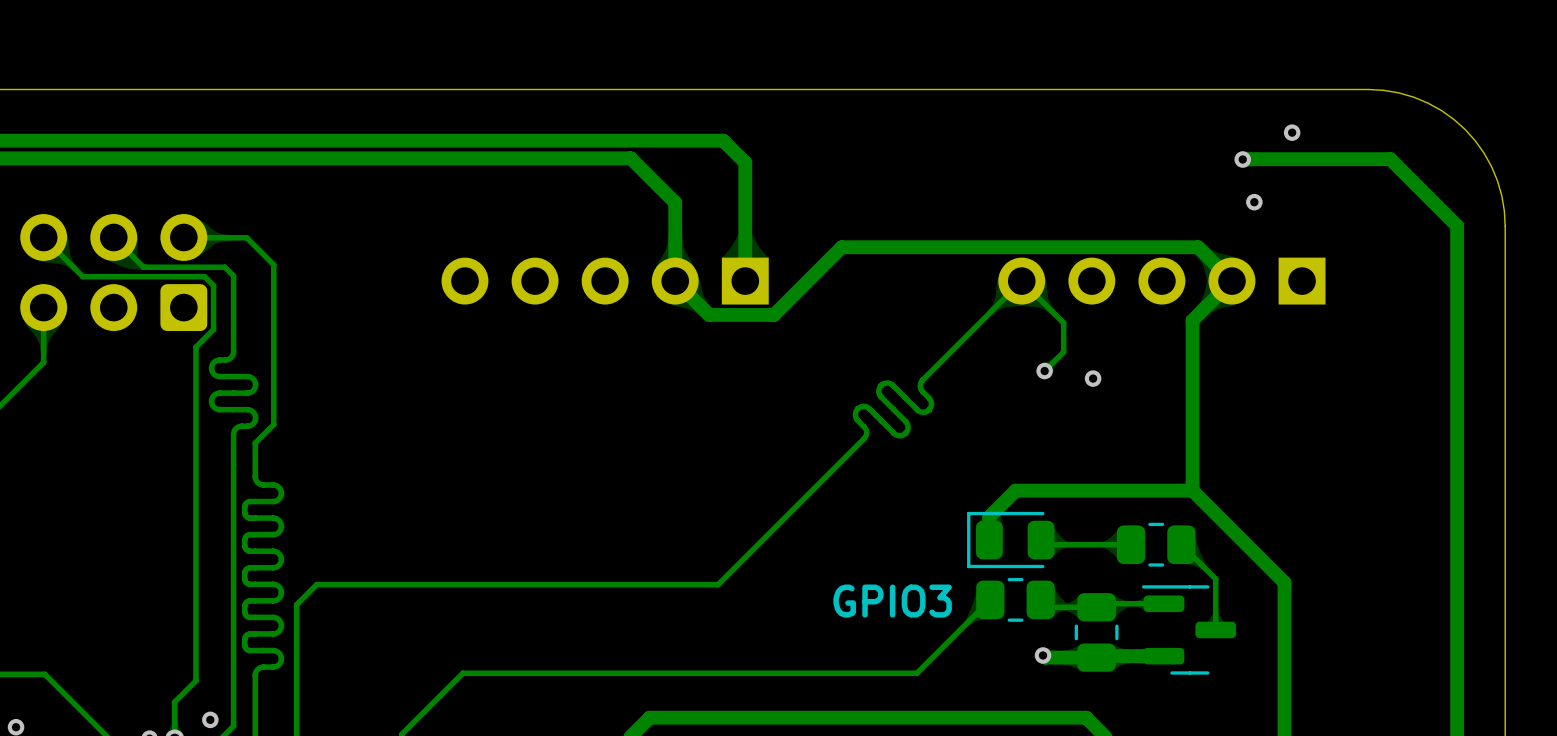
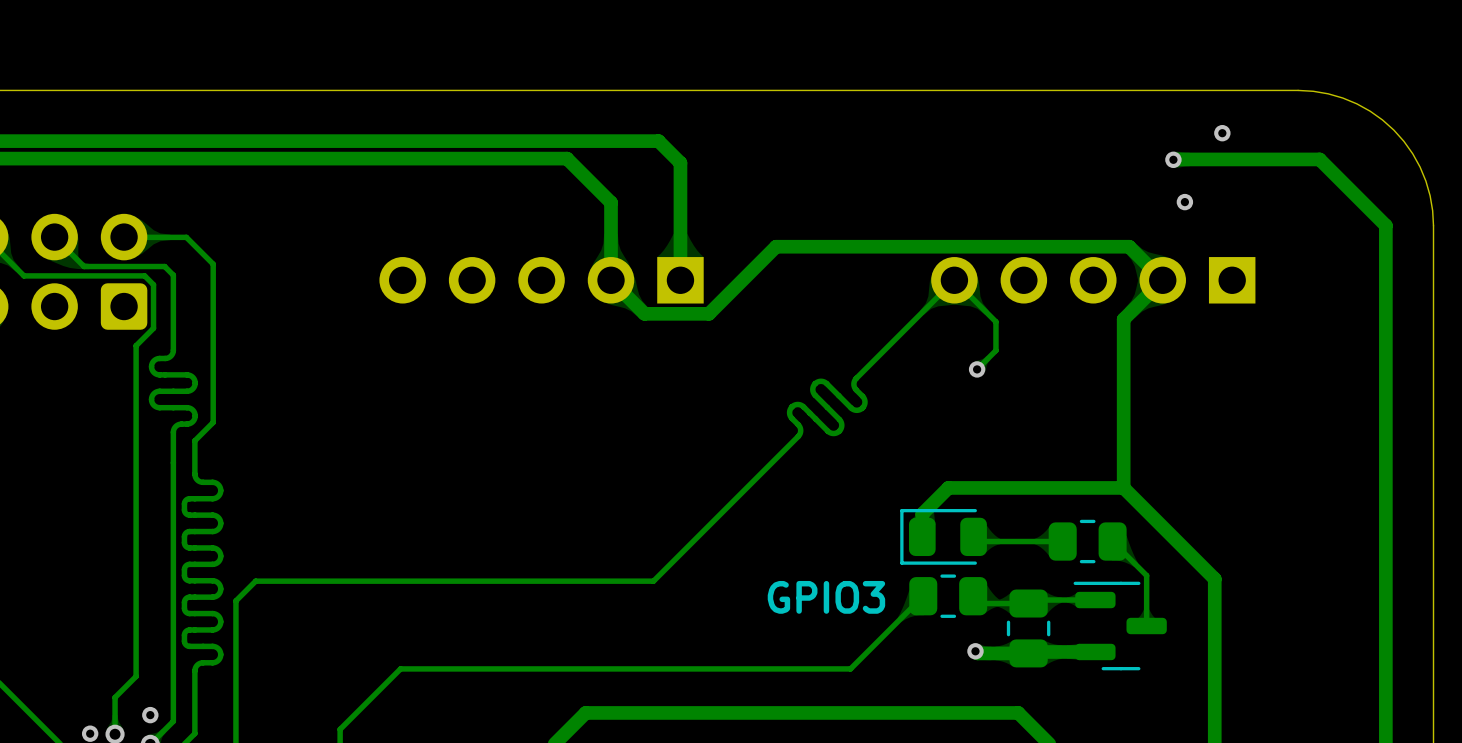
via: (1093, 378) -> none

